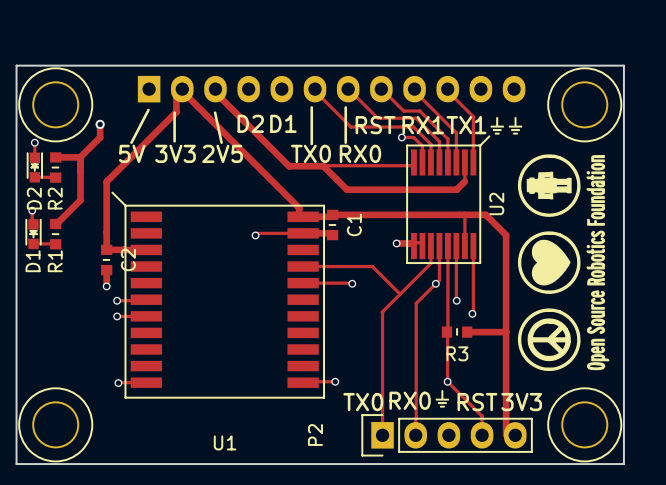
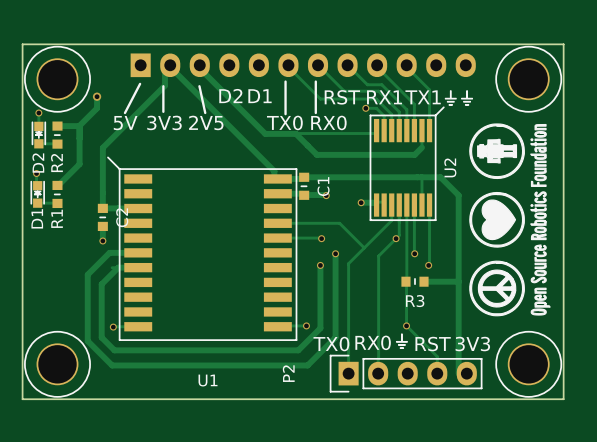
track: (299, 233) (257, 233) (255, 235) -> none
track: none -> (307, 195) (326, 195)
via: (255, 235) -> none
via: none -> (326, 195)
track: none -> (138, 252) (109, 252) (87, 274) (87, 341) (112, 365) (307, 365) (335, 337) (335, 253)
via: (117, 300) -> none
via: none -> (335, 253)
track: none -> (320, 265) (320, 328) (298, 350) (114, 350) (101, 337) (101, 284) (118, 267) (138, 267)
via: none -> (320, 265)
via: (117, 316) -> none

